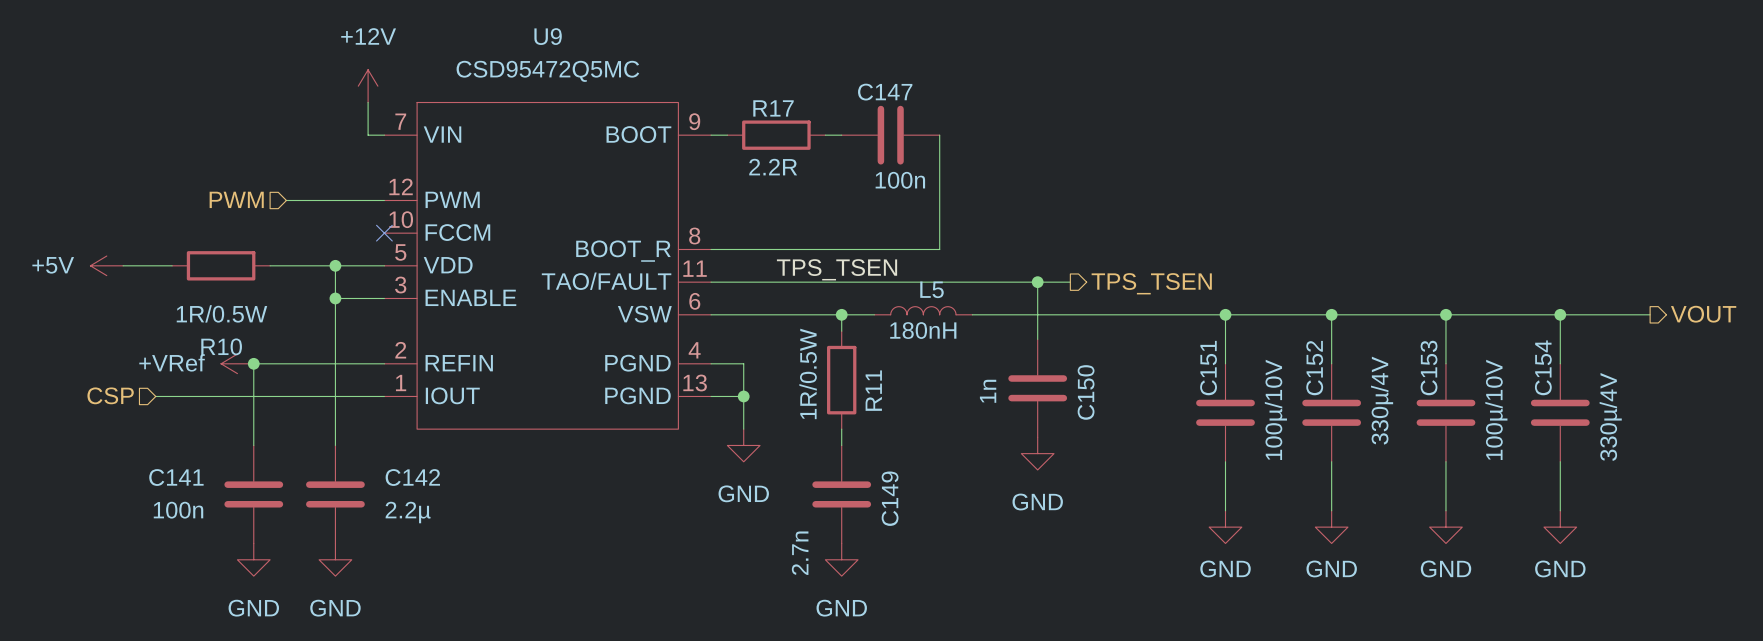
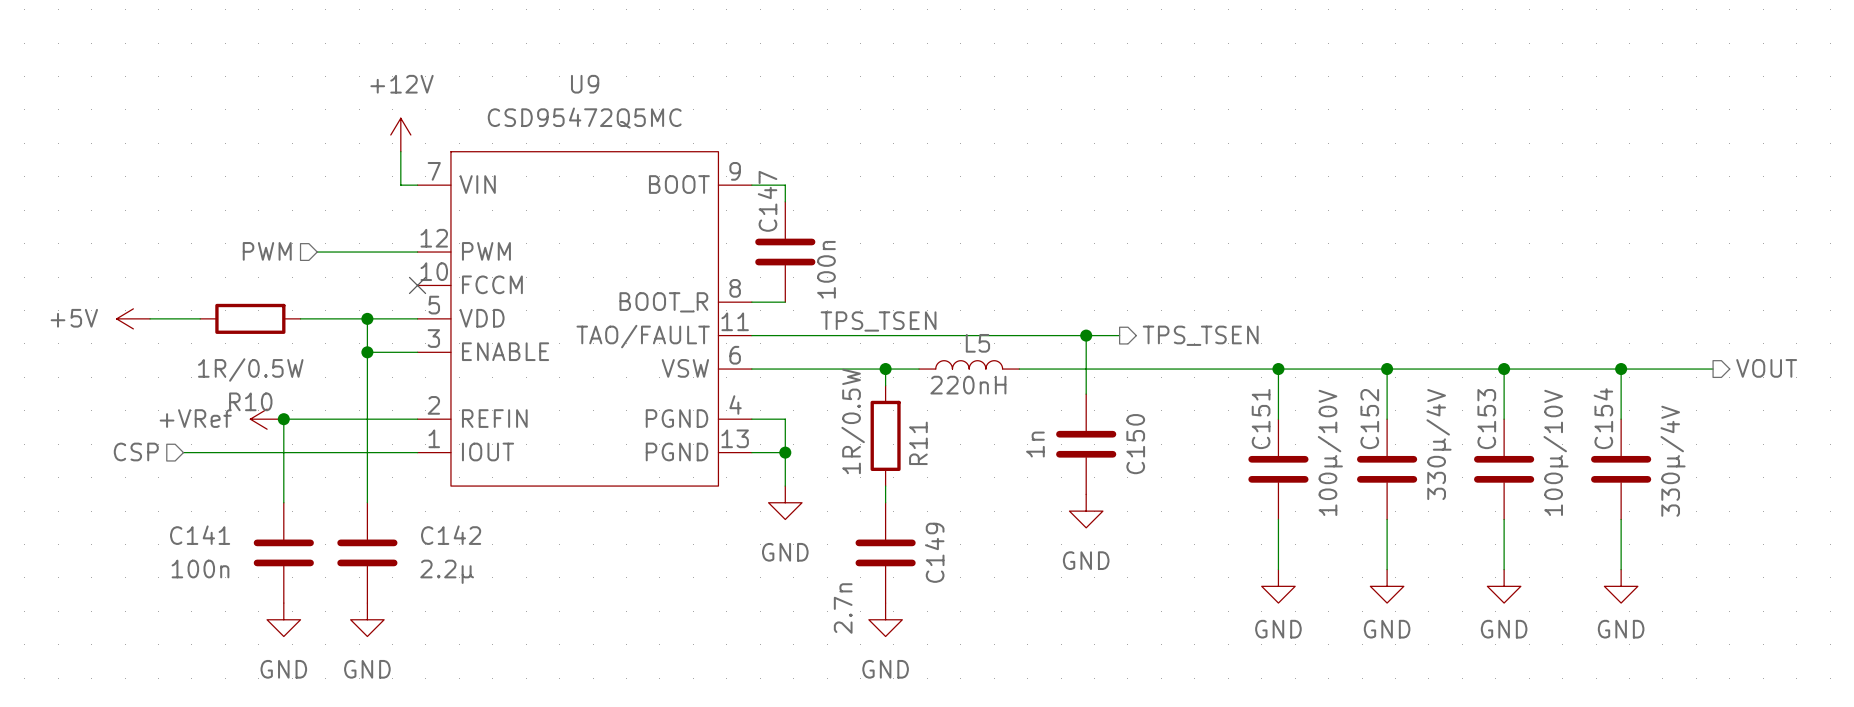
R17: 2.2R (776, 135) -> none
wire: (825, 135) (841, 135) -> none
C147 rotation: 0° (890, 135) -> 90° clockwise (785, 252)
C147 position: (890, 135) -> (785, 252)
wire: (939, 135) (939, 249) (743, 249) -> none
C147 value position: 100n (900, 180) -> 100n (826, 269)
L5 value: 180nH (923, 330) -> 220nH (968, 385)

